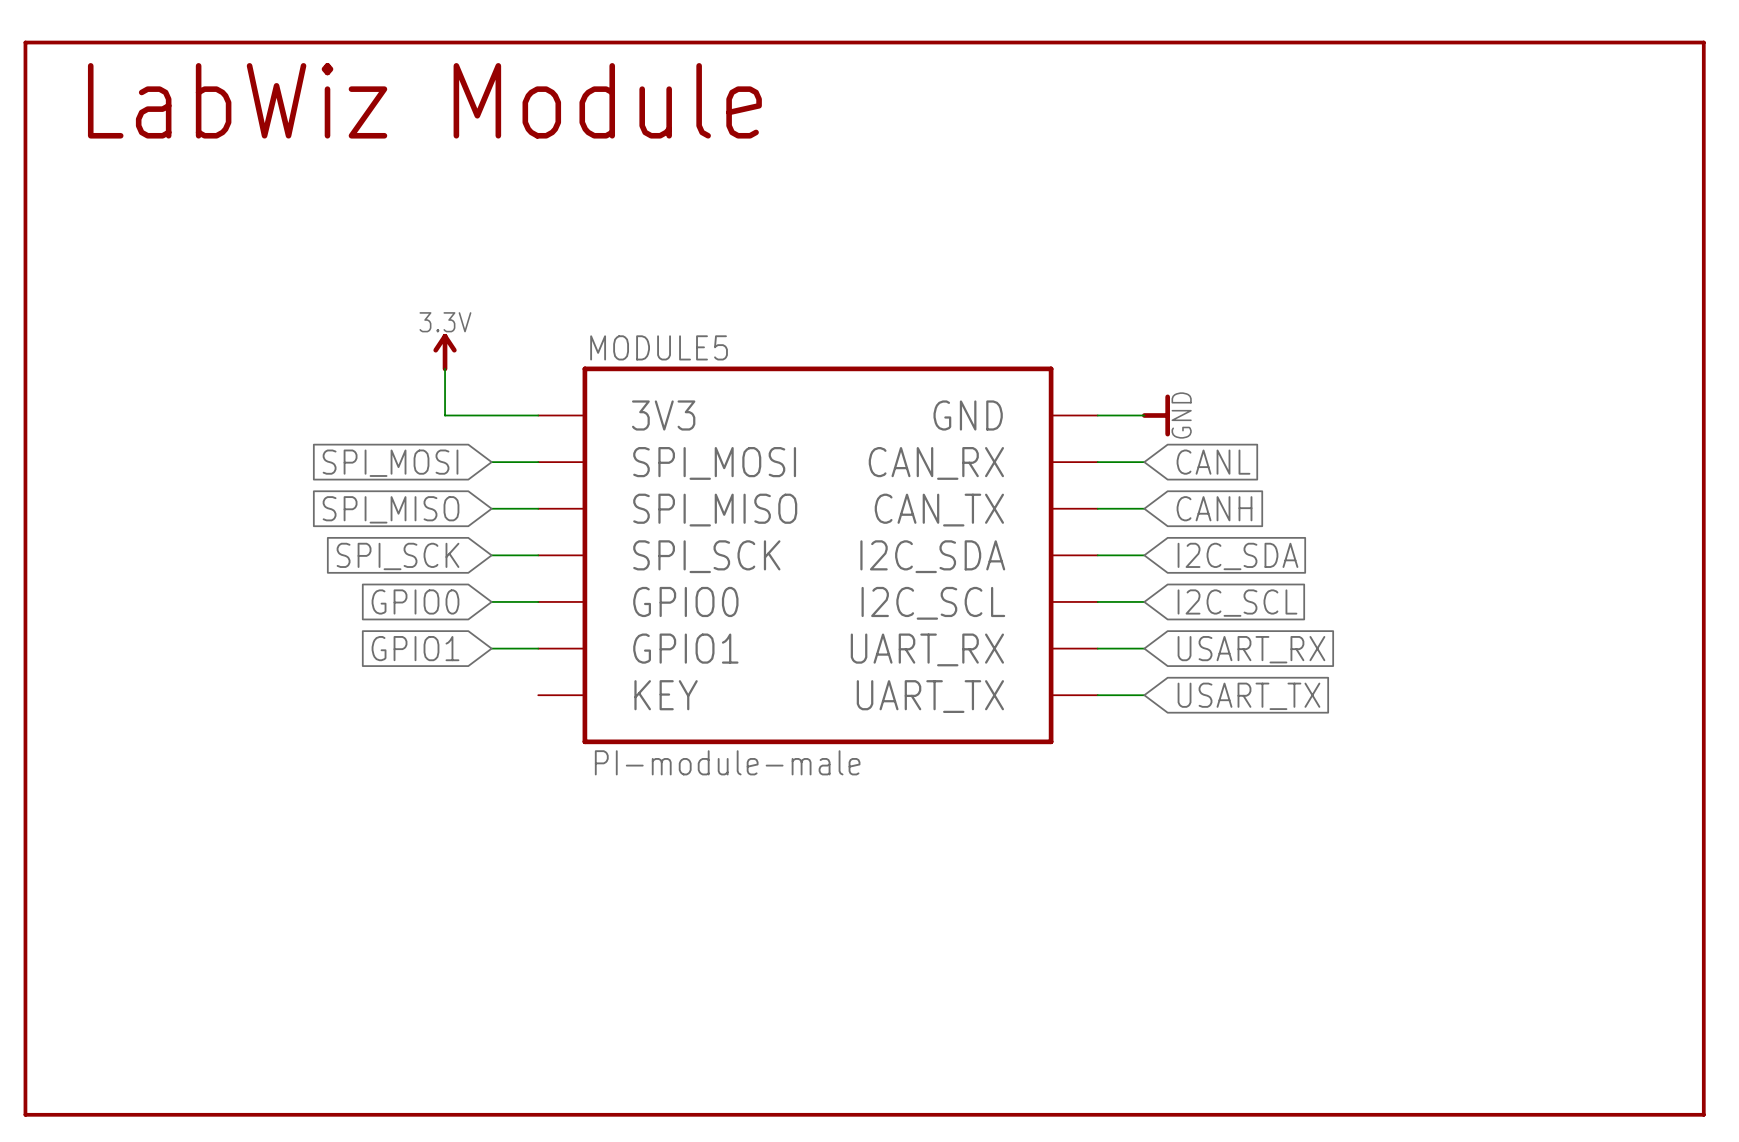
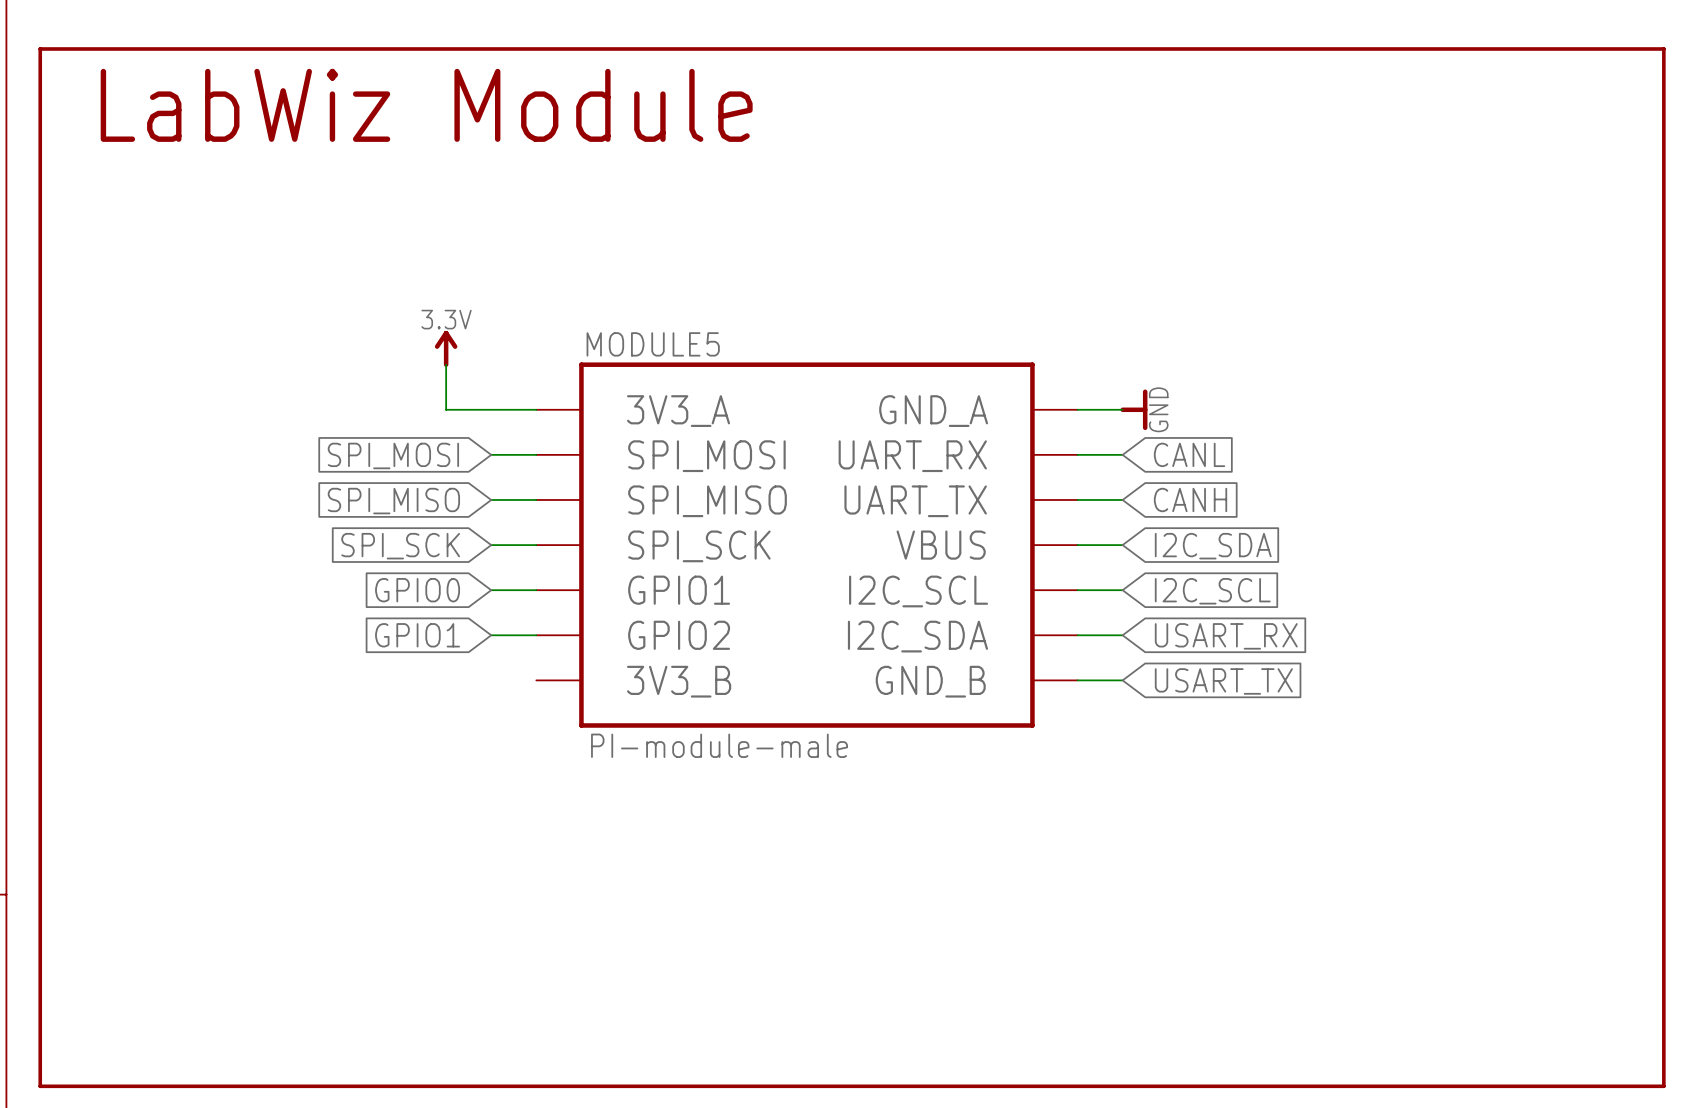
MODULE5 symbol: [538, 366, 1098, 745] -> [536, 362, 1078, 728]

